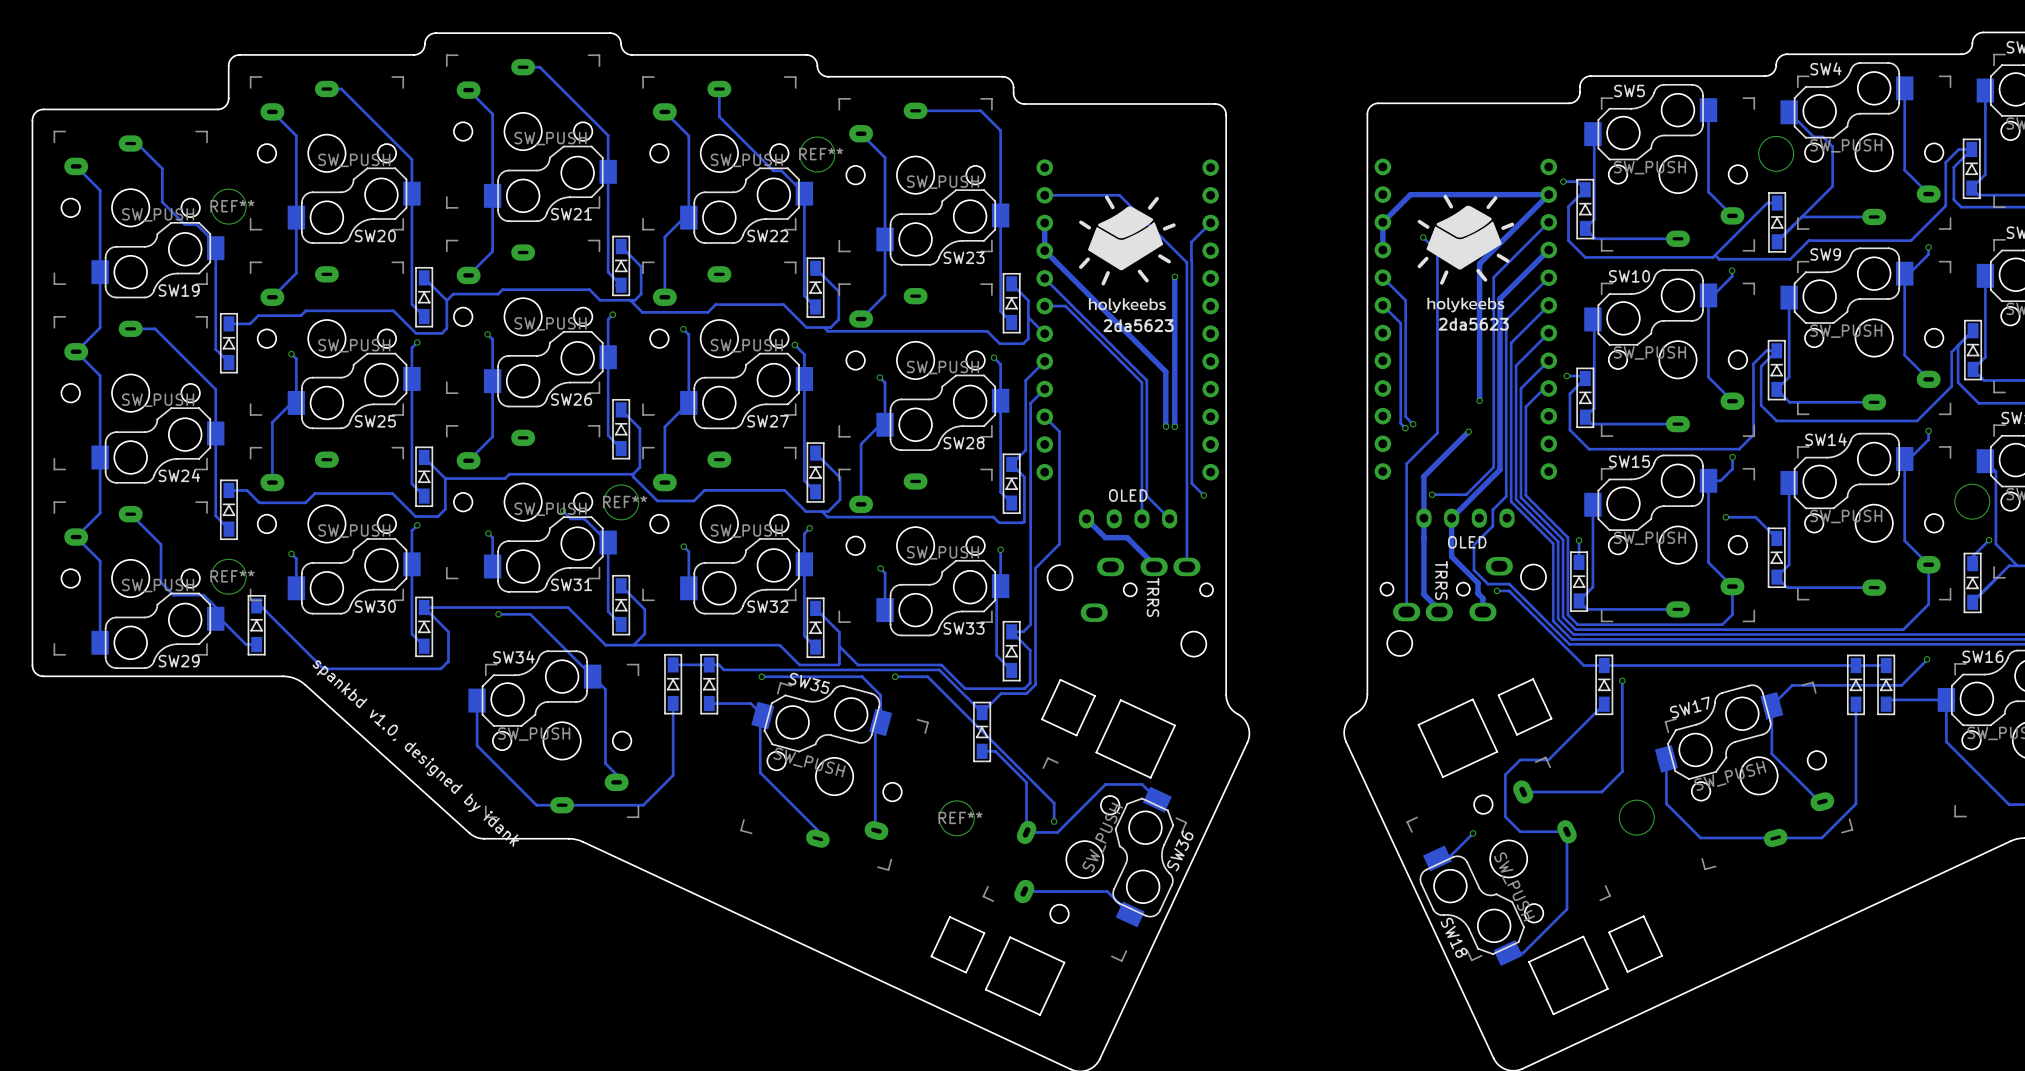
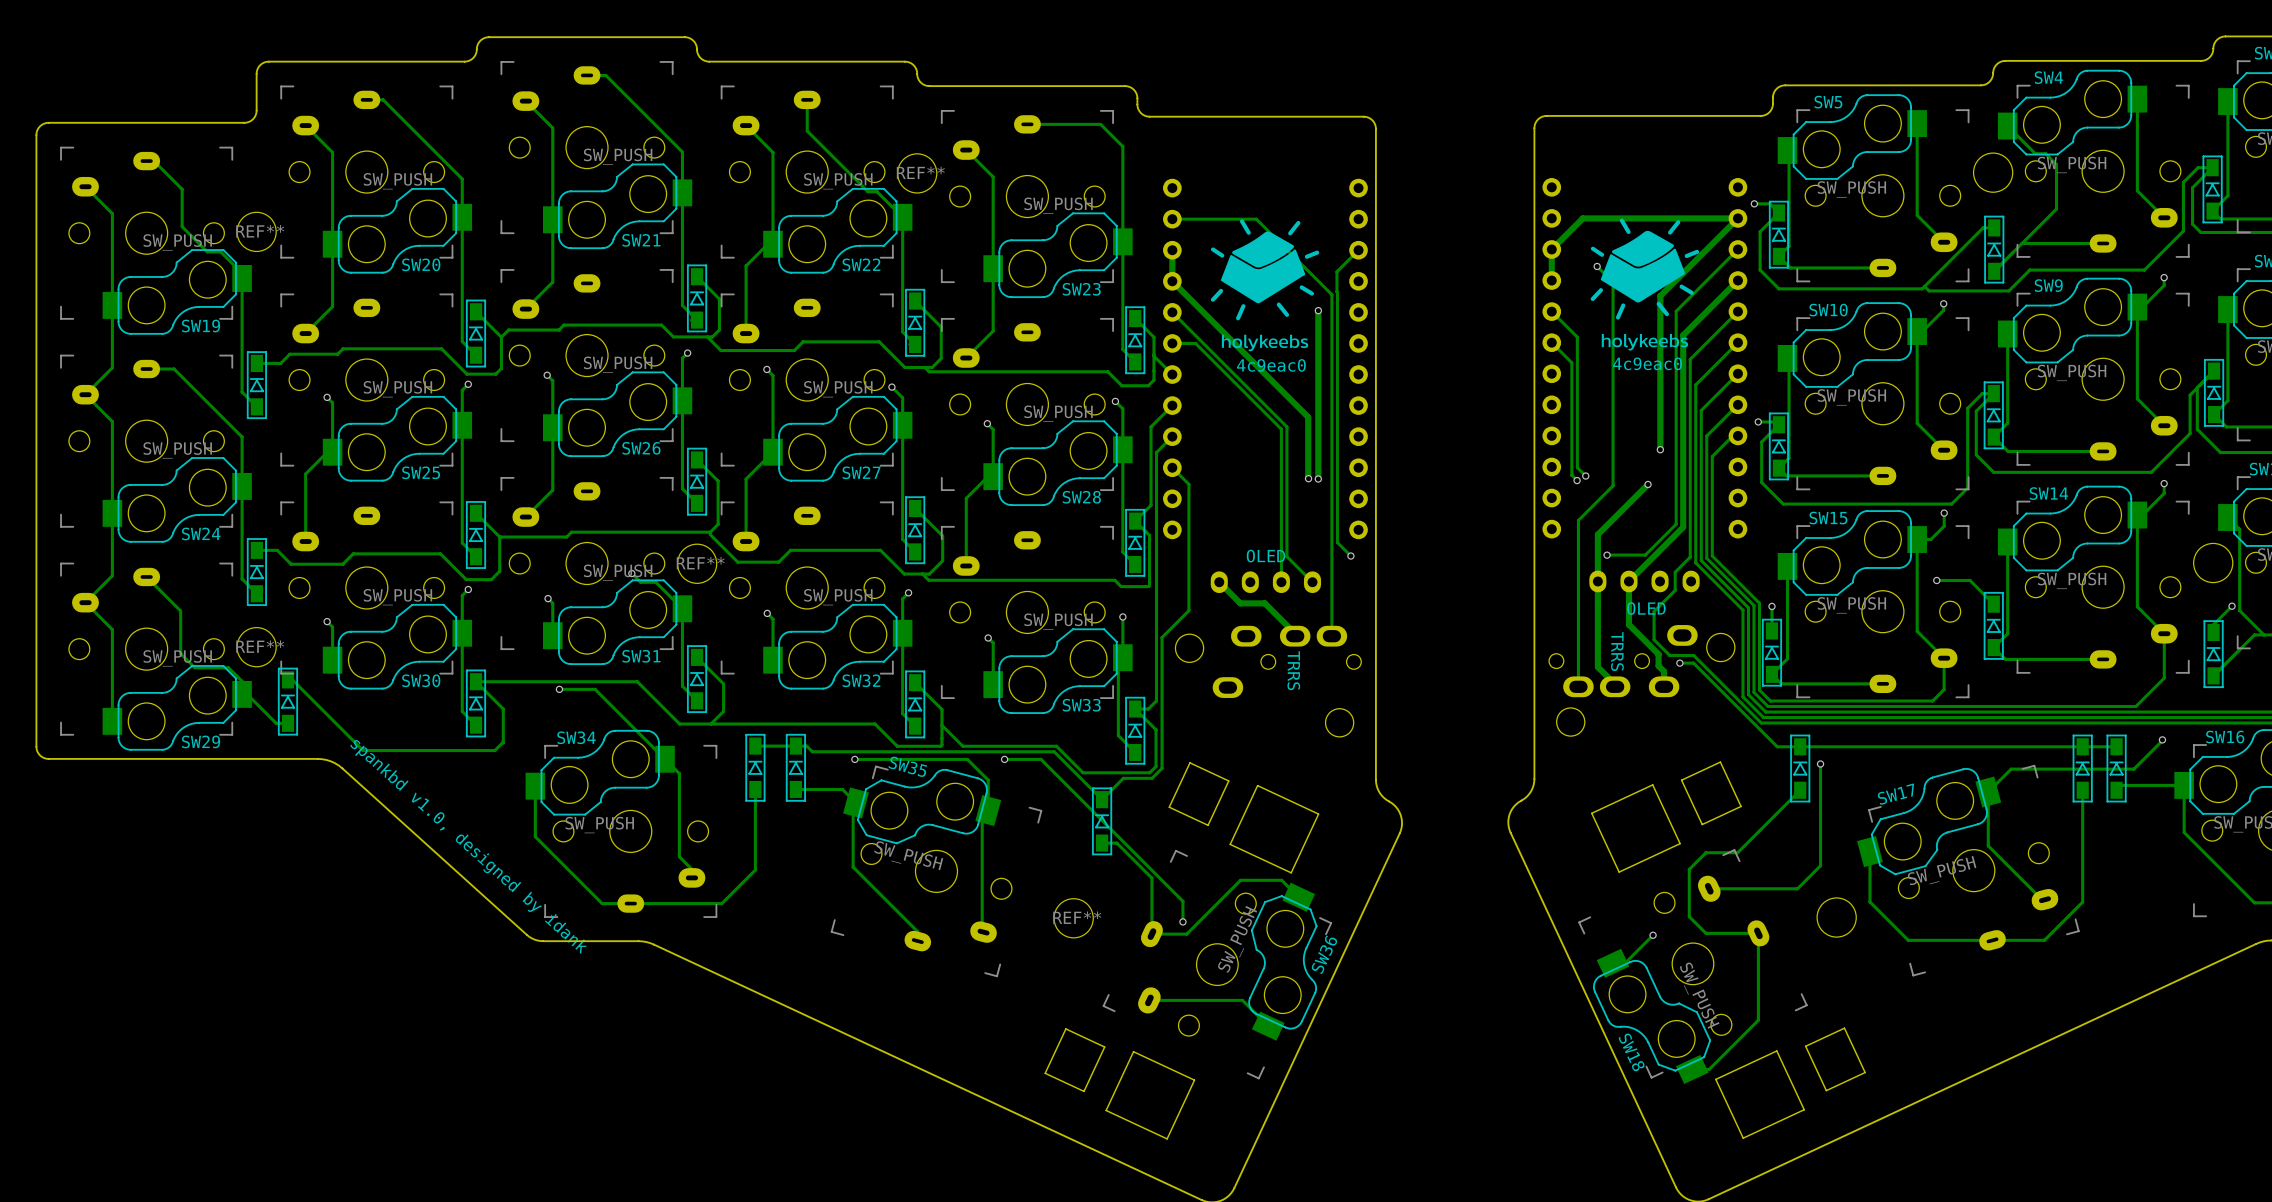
text: 2da5623 (1473, 324) -> 4c9eac0 (1647, 363)
text: 2da5623 (1138, 325) -> 4c9eac0 (1271, 365)

